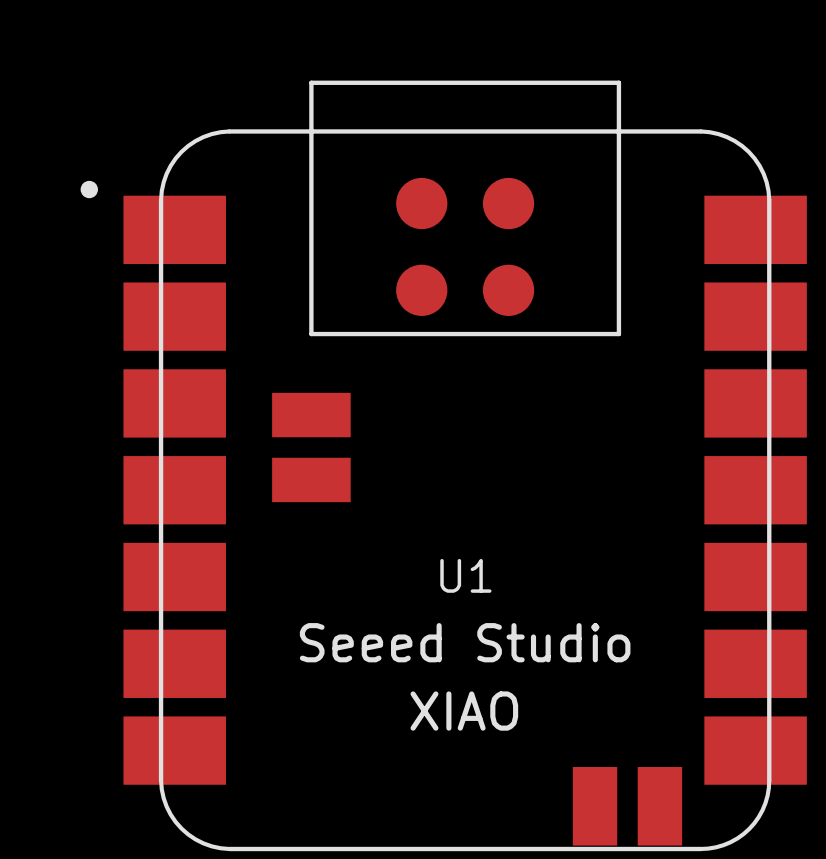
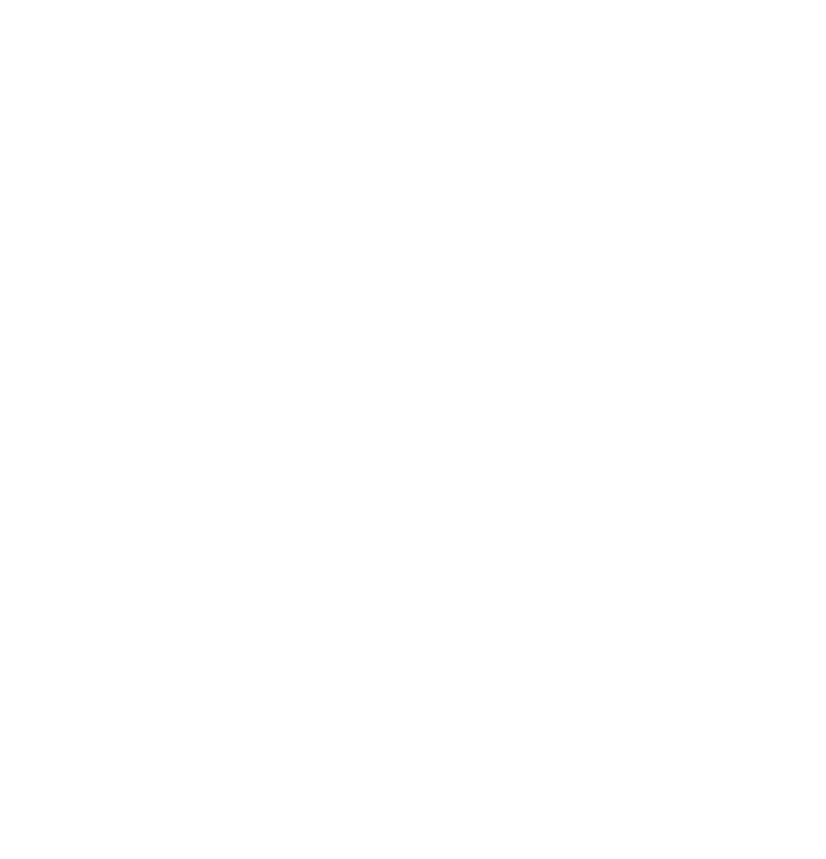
U1: (443, 465) -> none

